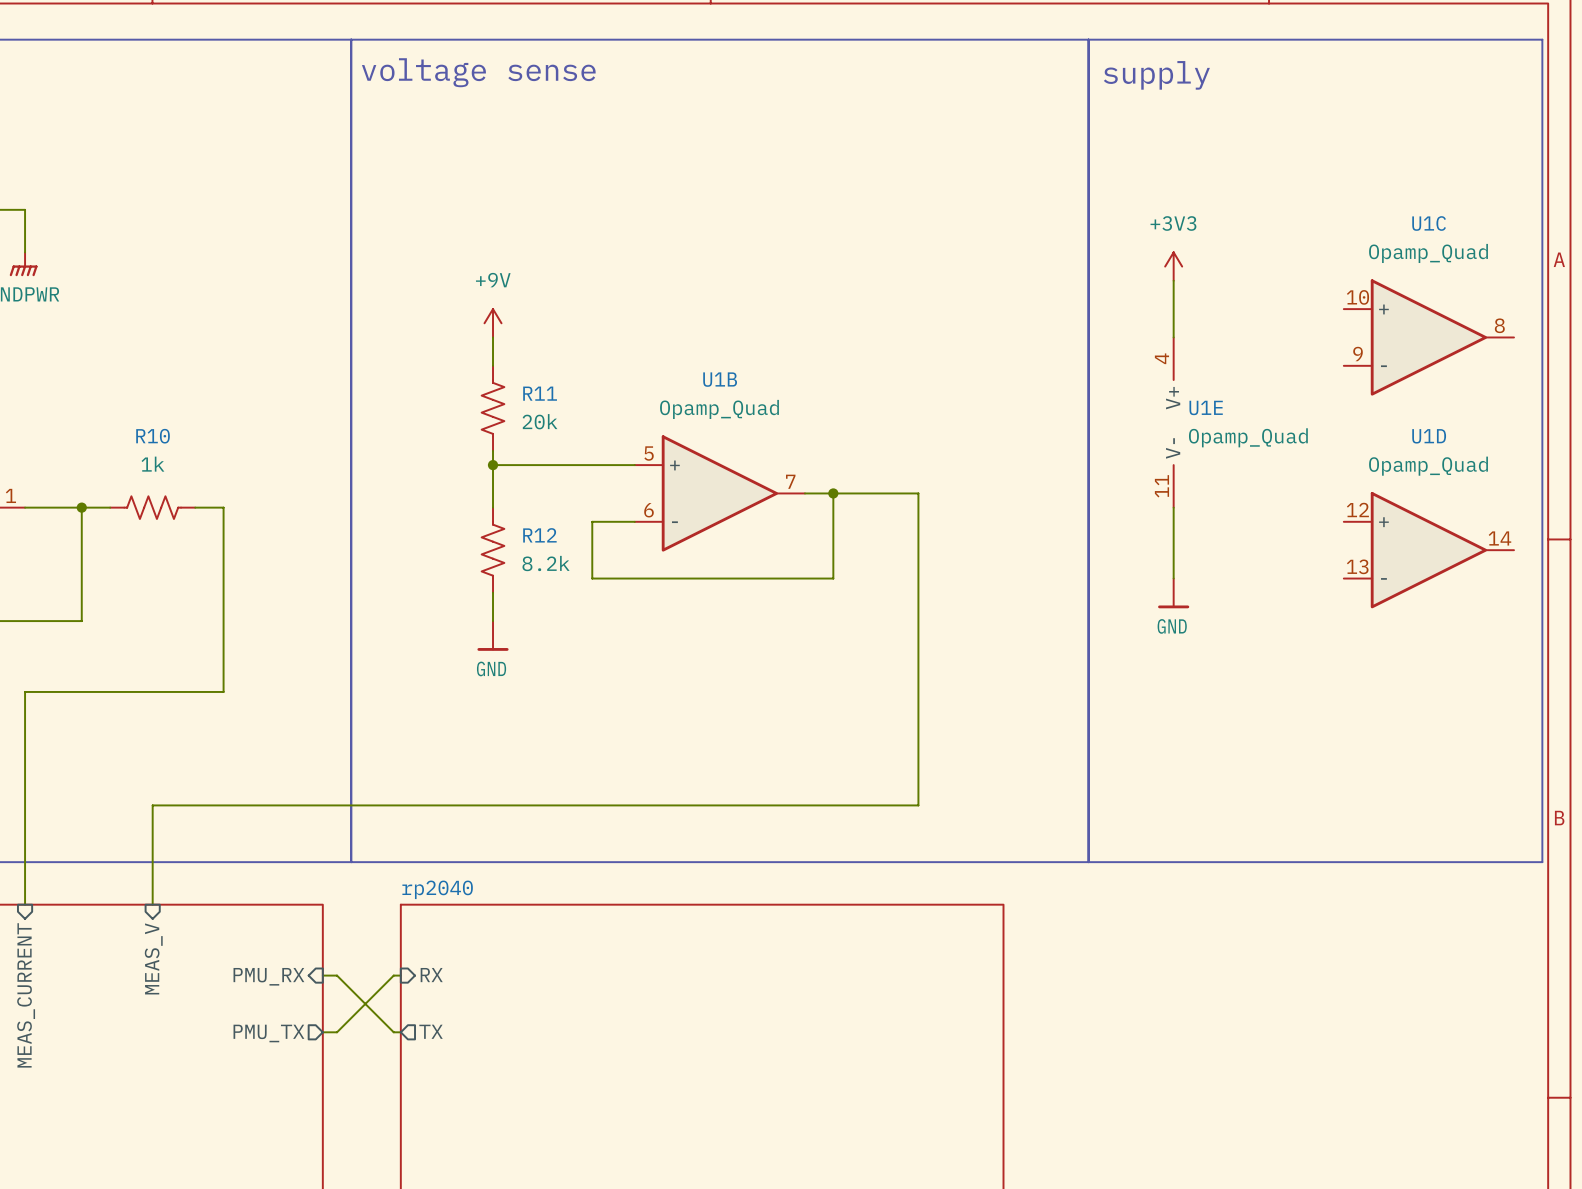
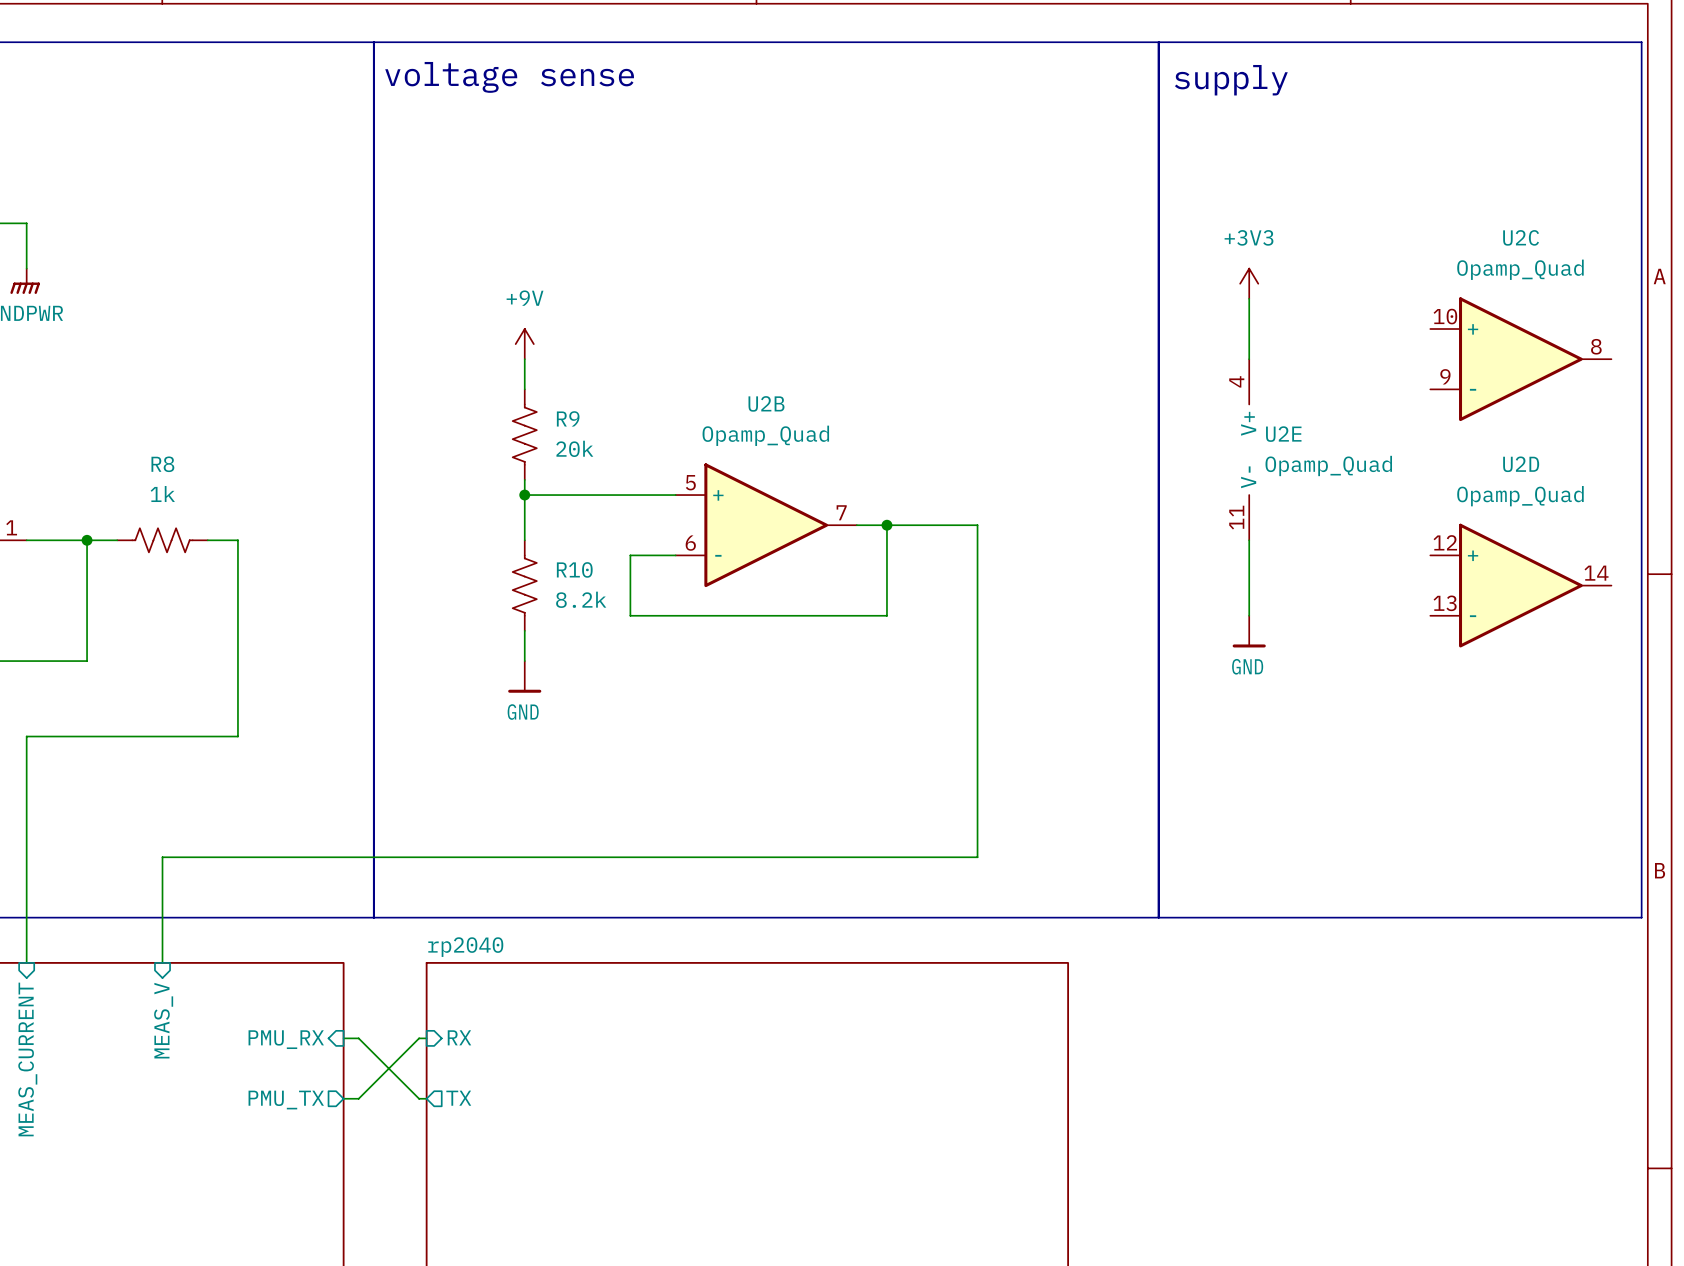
U1C name: U1C (1429, 223) -> U2C (1521, 237)
U1B name: U1B (720, 379) -> U2B (766, 403)
R11 name: R11 (540, 393) -> R9 (568, 418)
U1E name: U1E (1206, 407) -> U2E (1283, 434)
R10 name: R10 (153, 436) -> R8 (162, 464)
U1D name: U1D (1429, 436) -> U2D (1521, 464)
R12 name: R12 (539, 535) -> R10 (574, 569)

